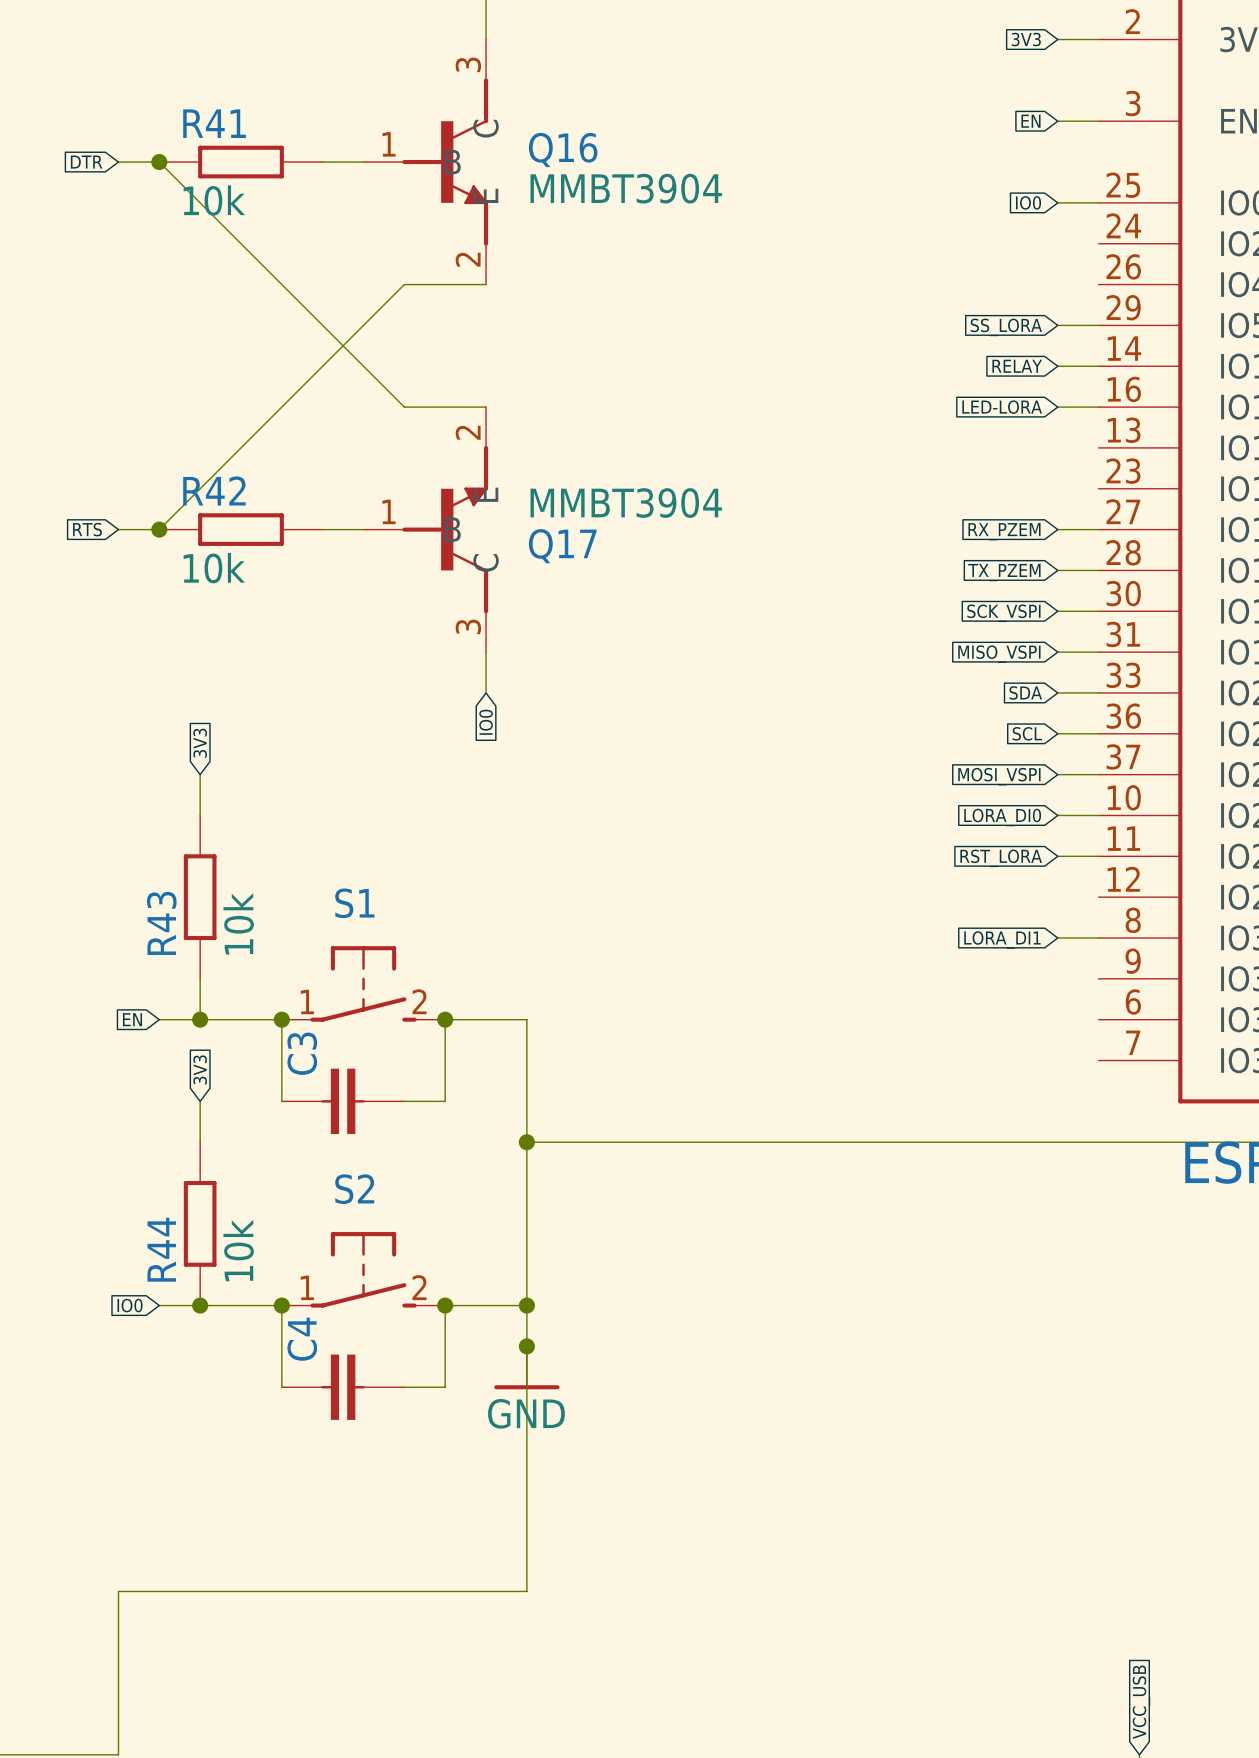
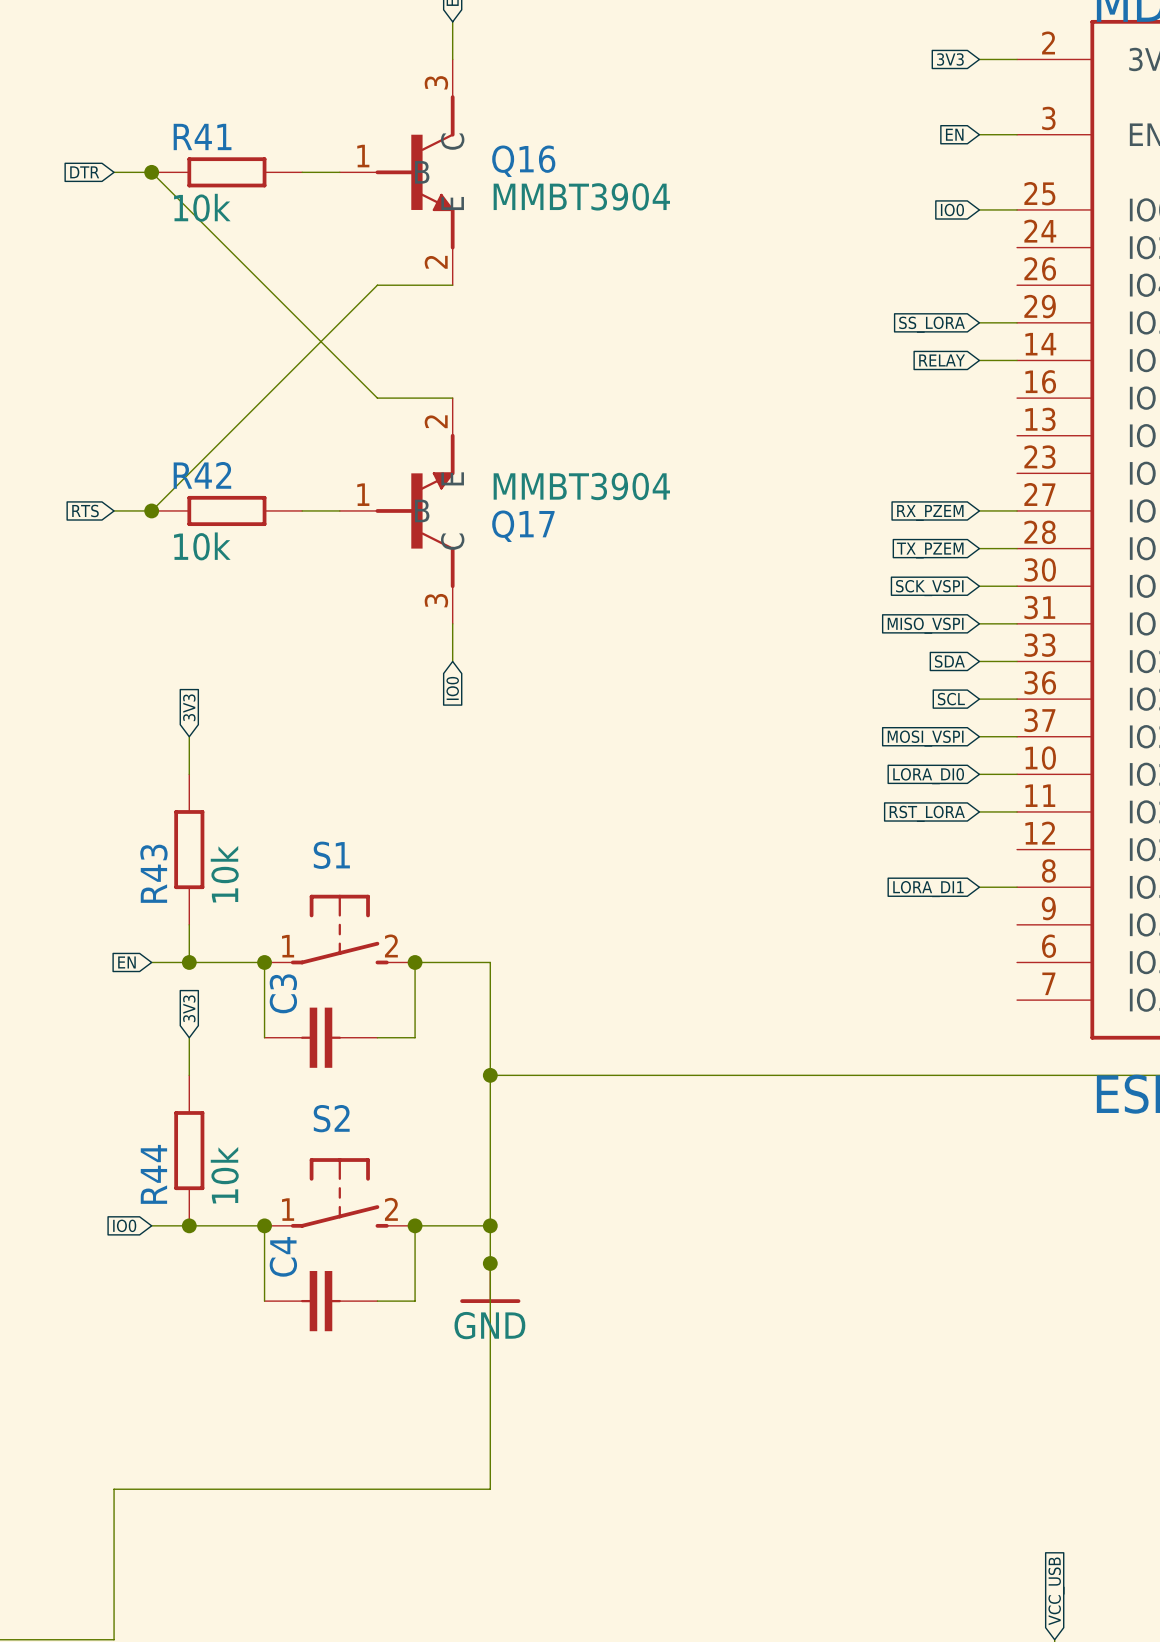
global label: LED-LORA (1002, 407) -> none
wire: (1057, 407) (1098, 407) -> none

